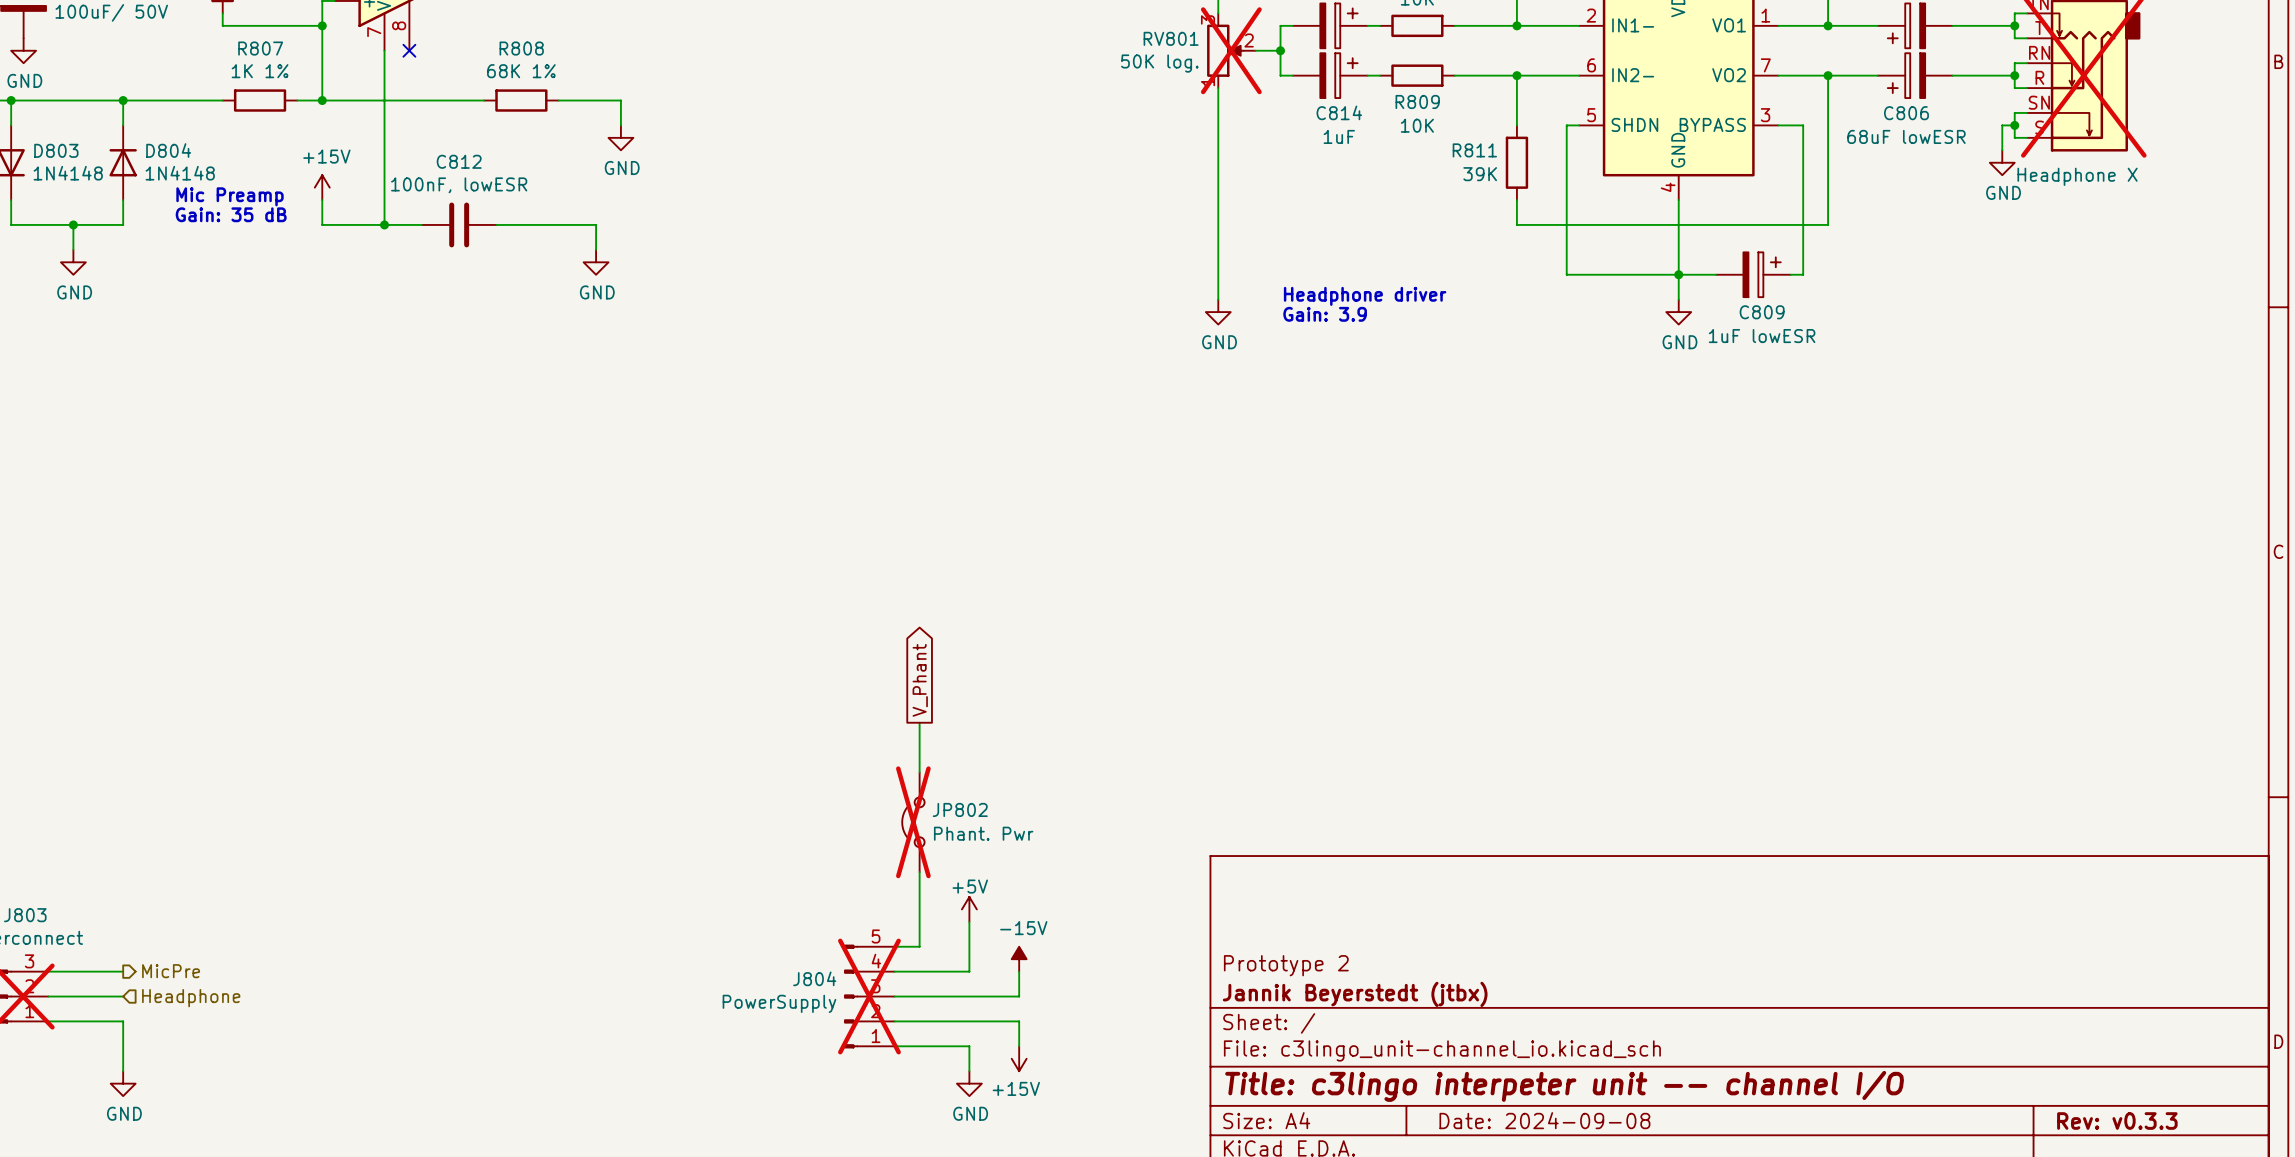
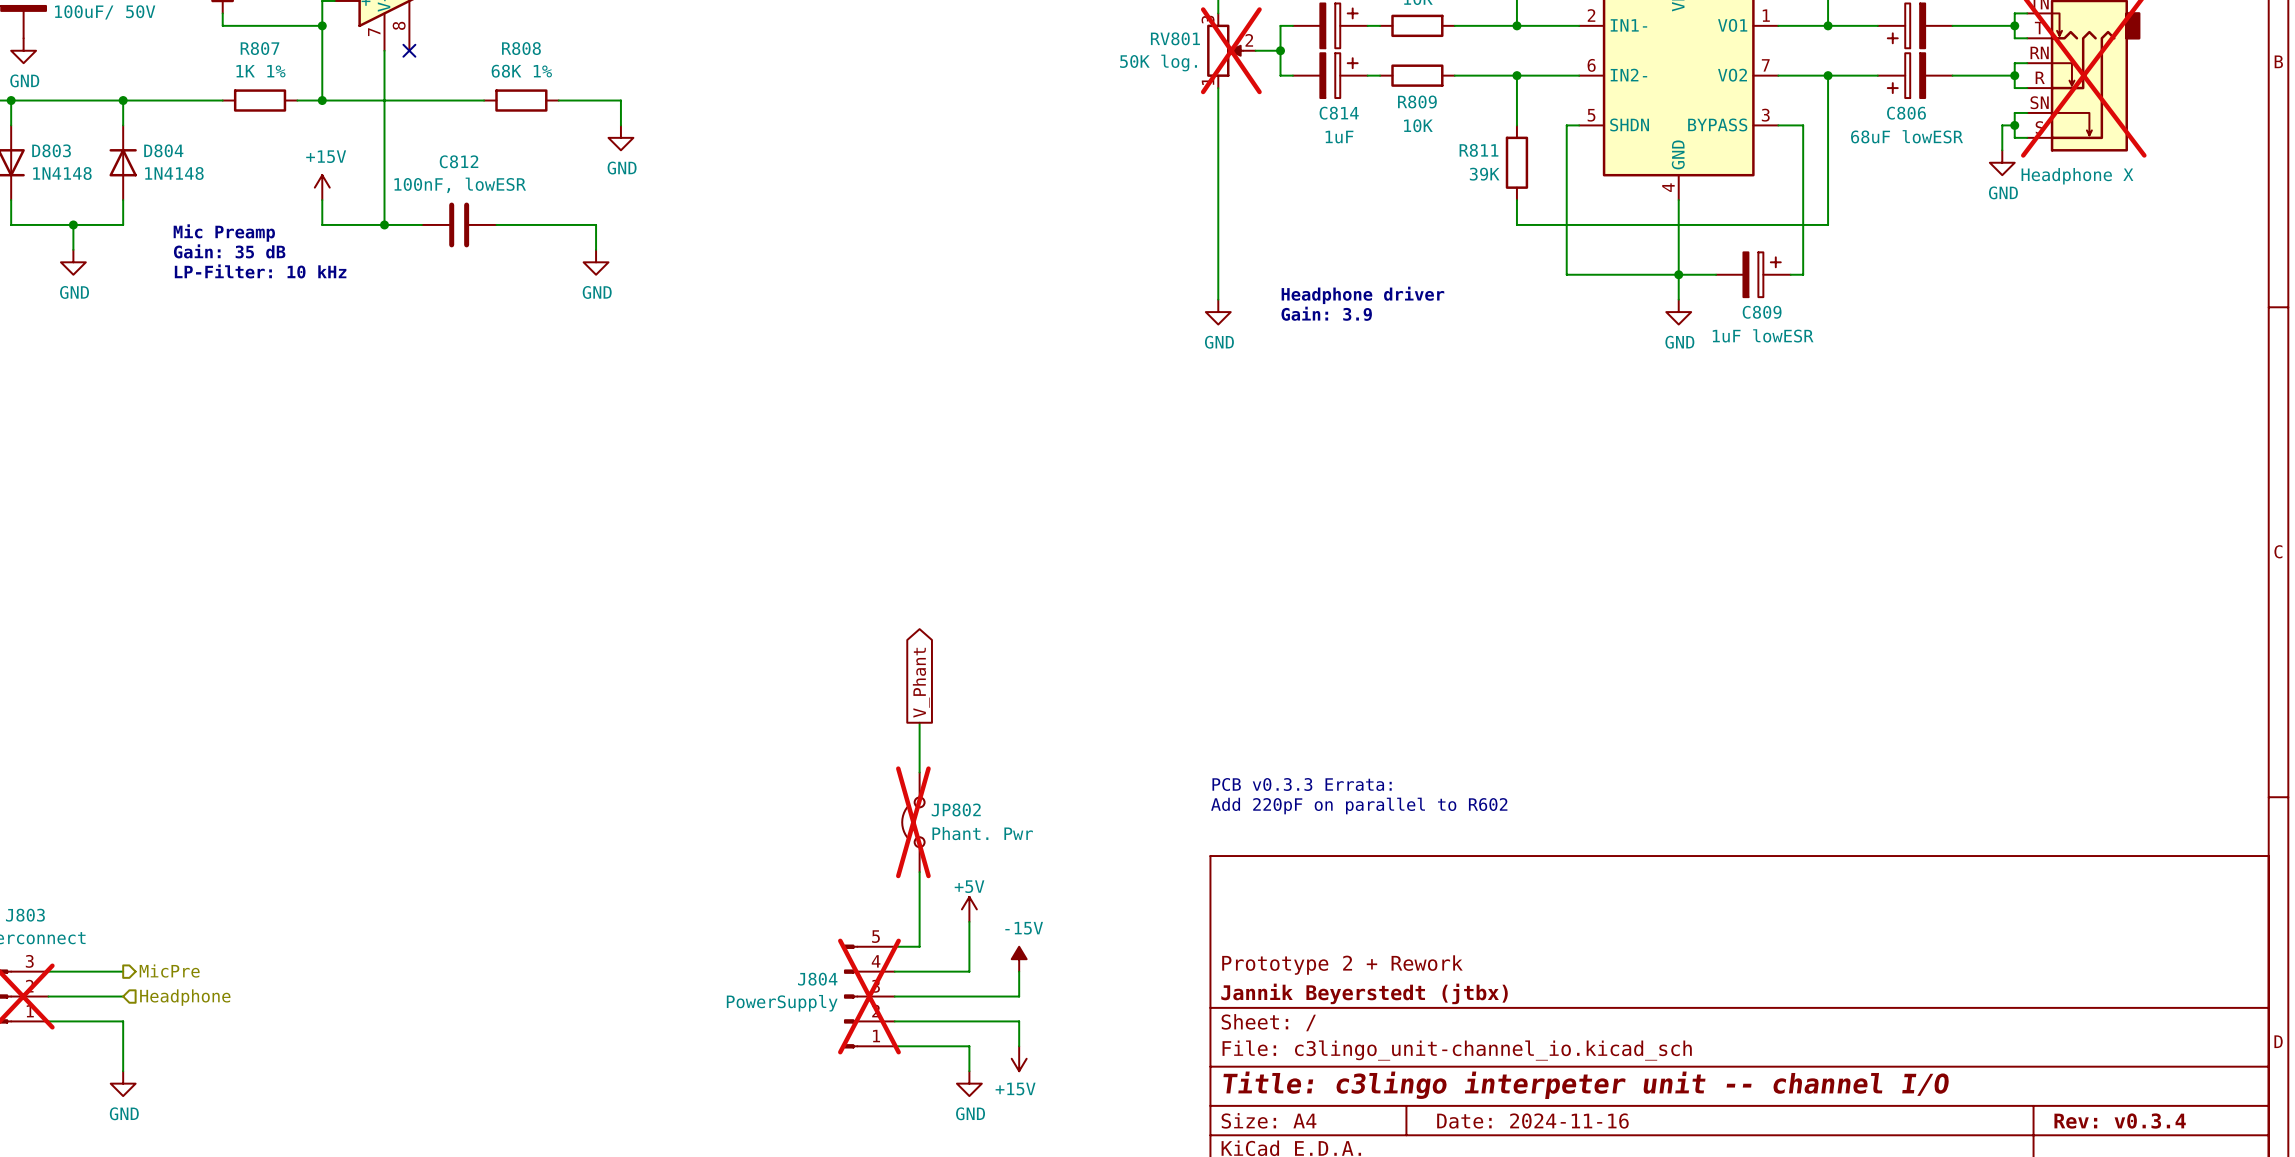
text position: Mic Preamp (229, 196) -> Mic Preamp (224, 233)
text position: Gain: 35 dB (231, 214) -> Gain: 35 dB (229, 251)
text: none -> LP-Filter: 10 kHz (260, 271)
text: none -> PCB v0.3.3 Errata: (1302, 784)
text: none -> Add 220pF on parallel to R602 (1359, 805)
title block: Prototype 2 (1286, 965) -> Prototype 2 + Rework (1342, 965)
title block: Date: 2024-09-08 (1544, 1120) -> Date: 2024-11-16 (1532, 1121)
title block: Rev: v0.3.3 (2117, 1121) -> Rev: v0.3.4 (2120, 1121)

